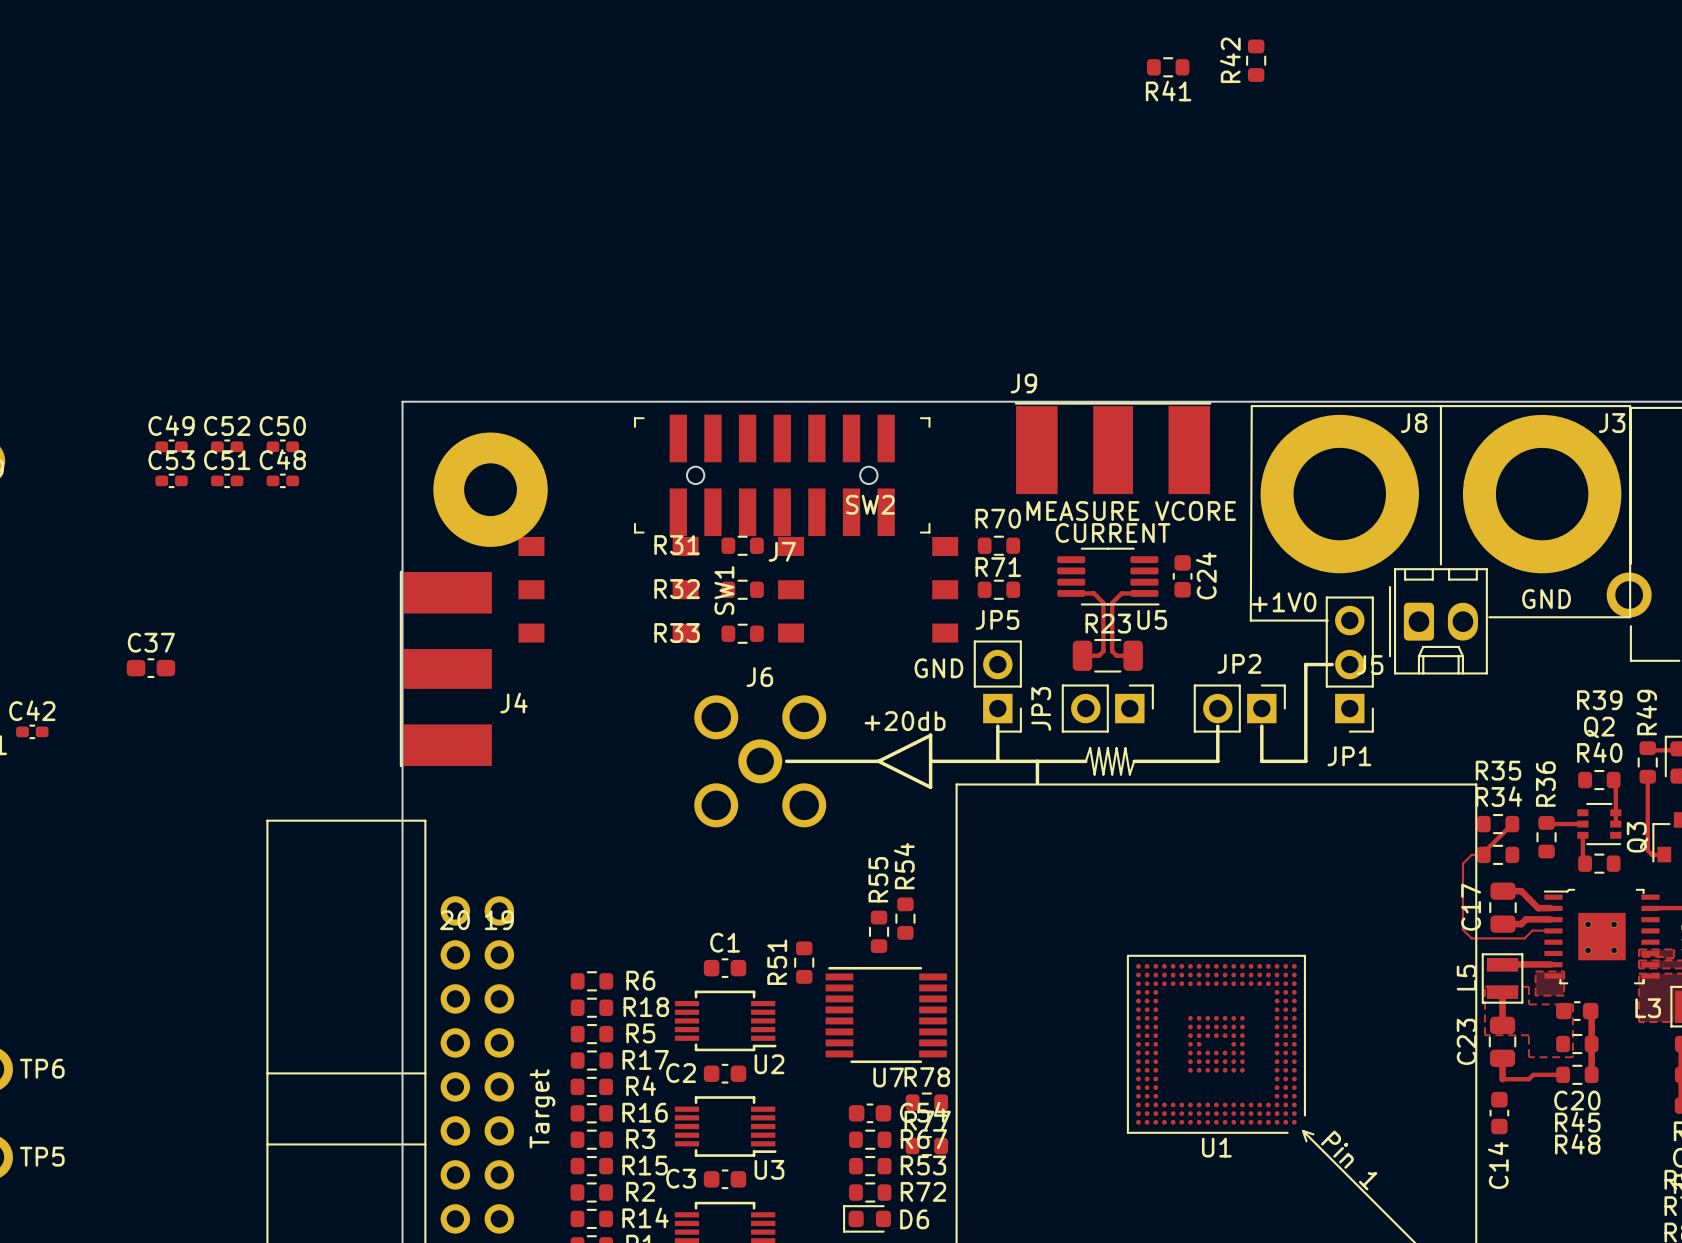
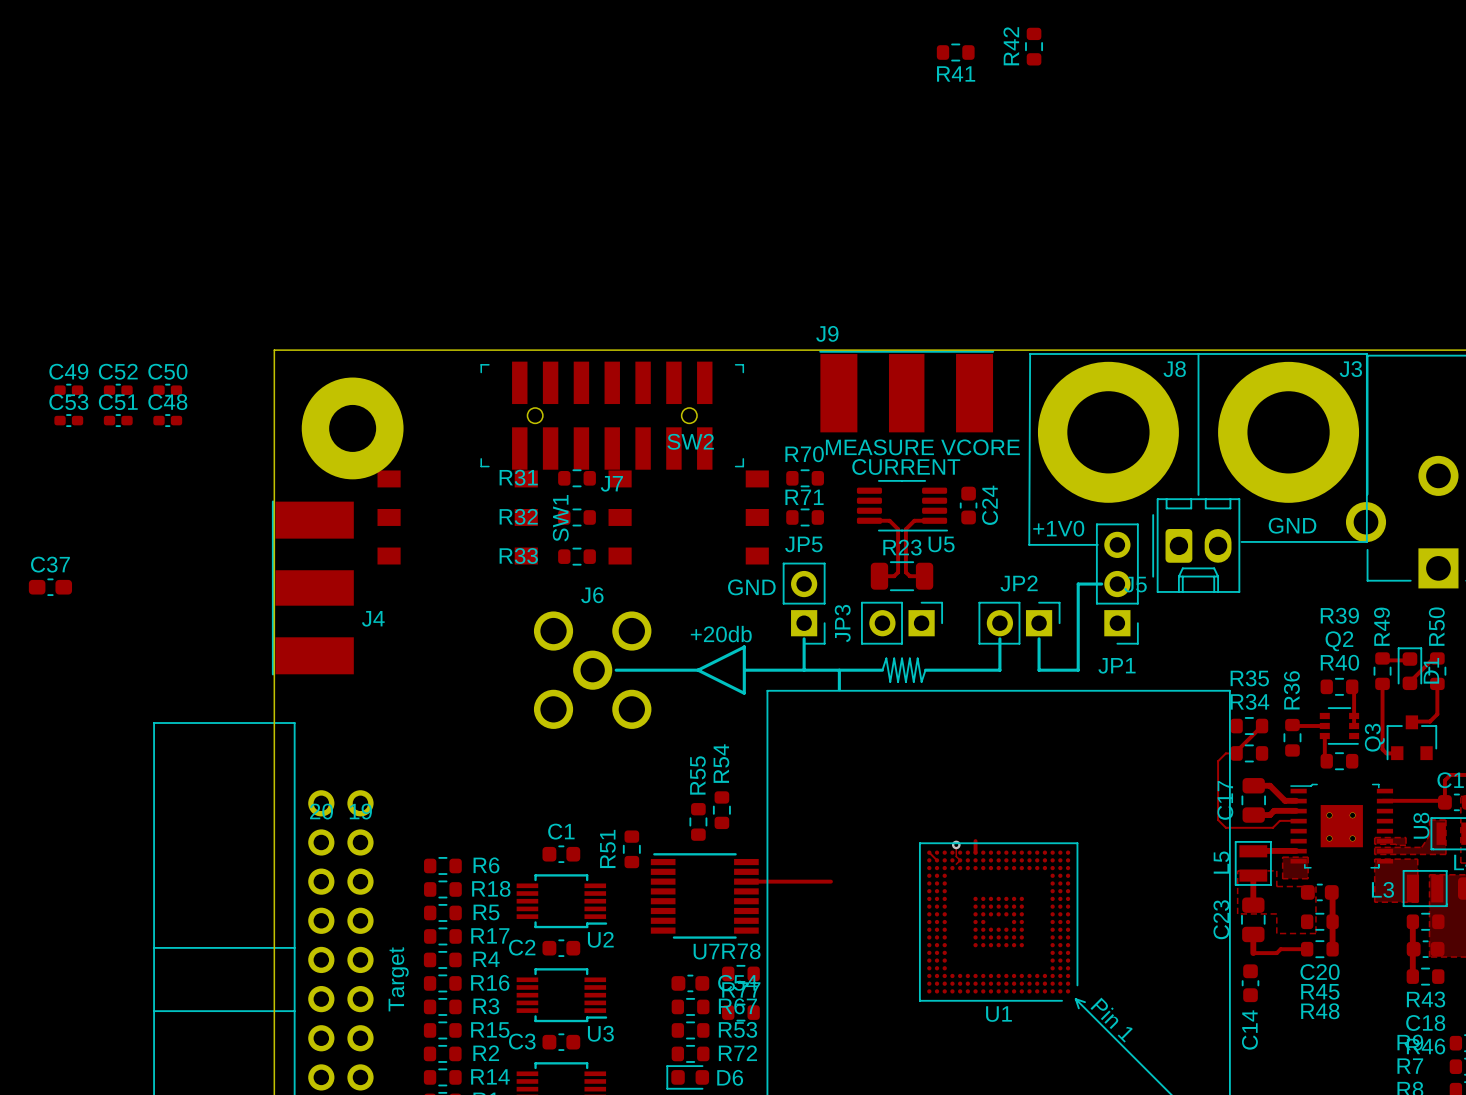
track: none -> (975, 841) (975, 852)
track: none -> (956, 844) (956, 856) (960, 860) (956, 864)
via: none -> (956, 844)
track: none -> (929, 852) (937, 860)
track: none -> (746, 881) (830, 881)

